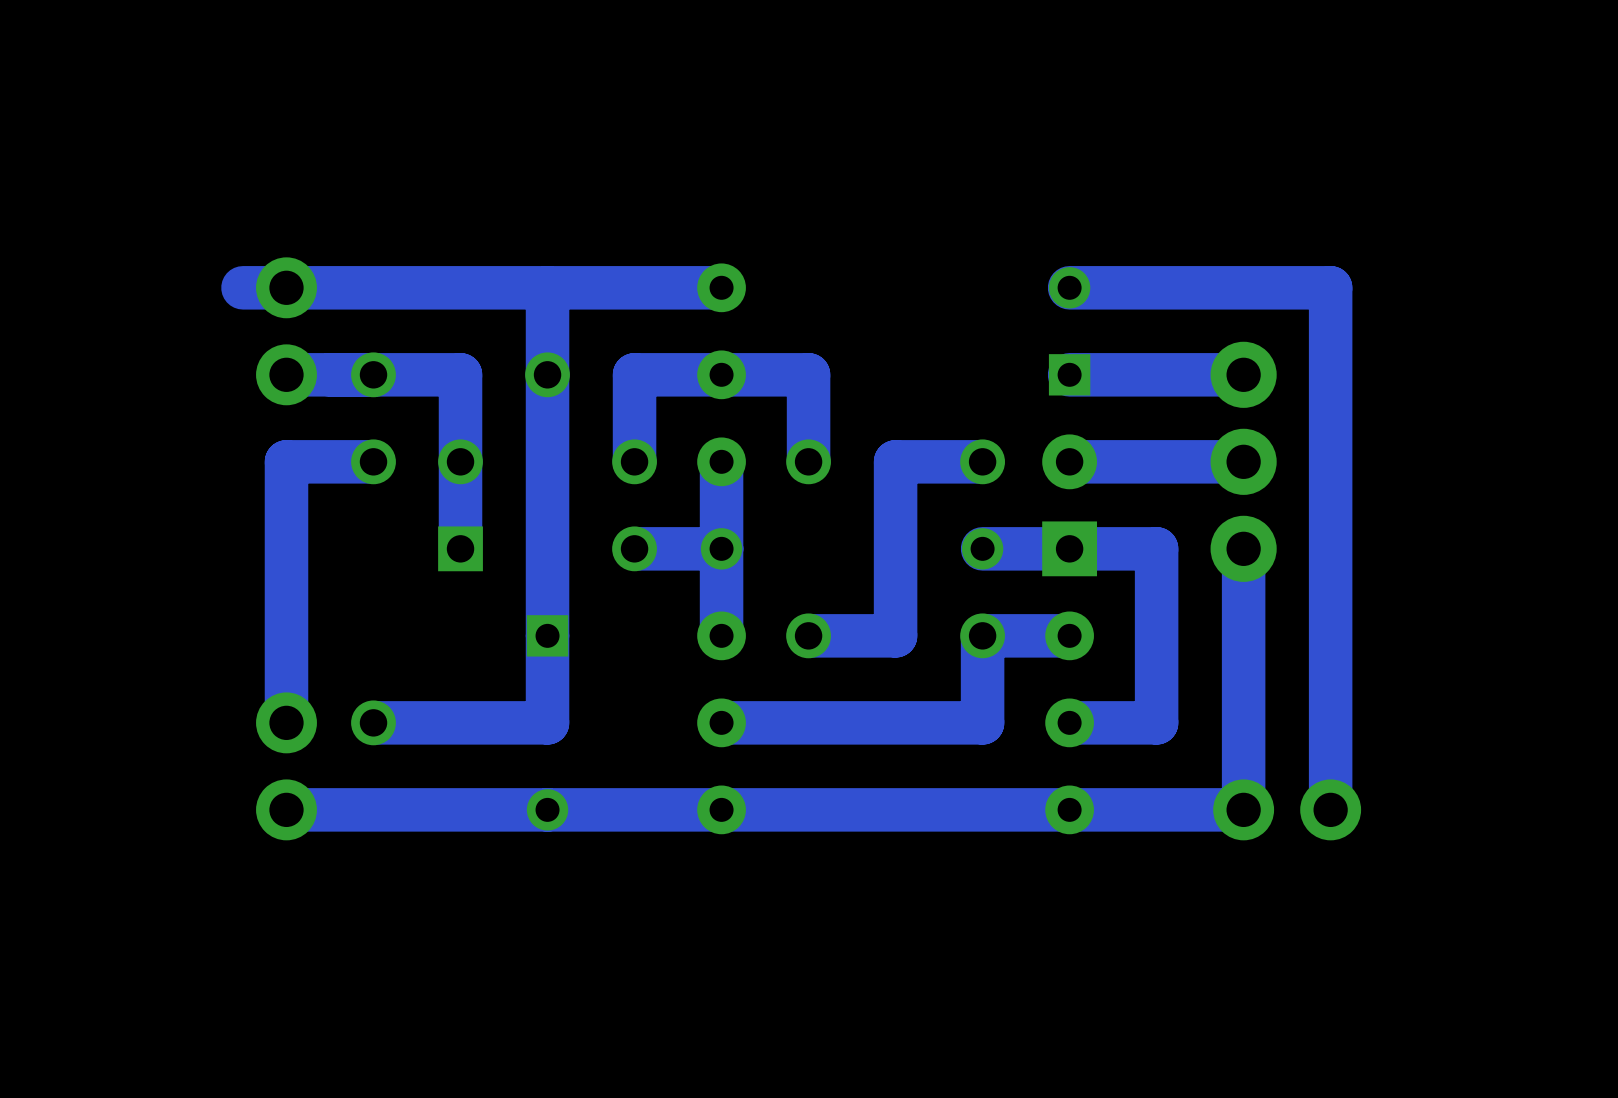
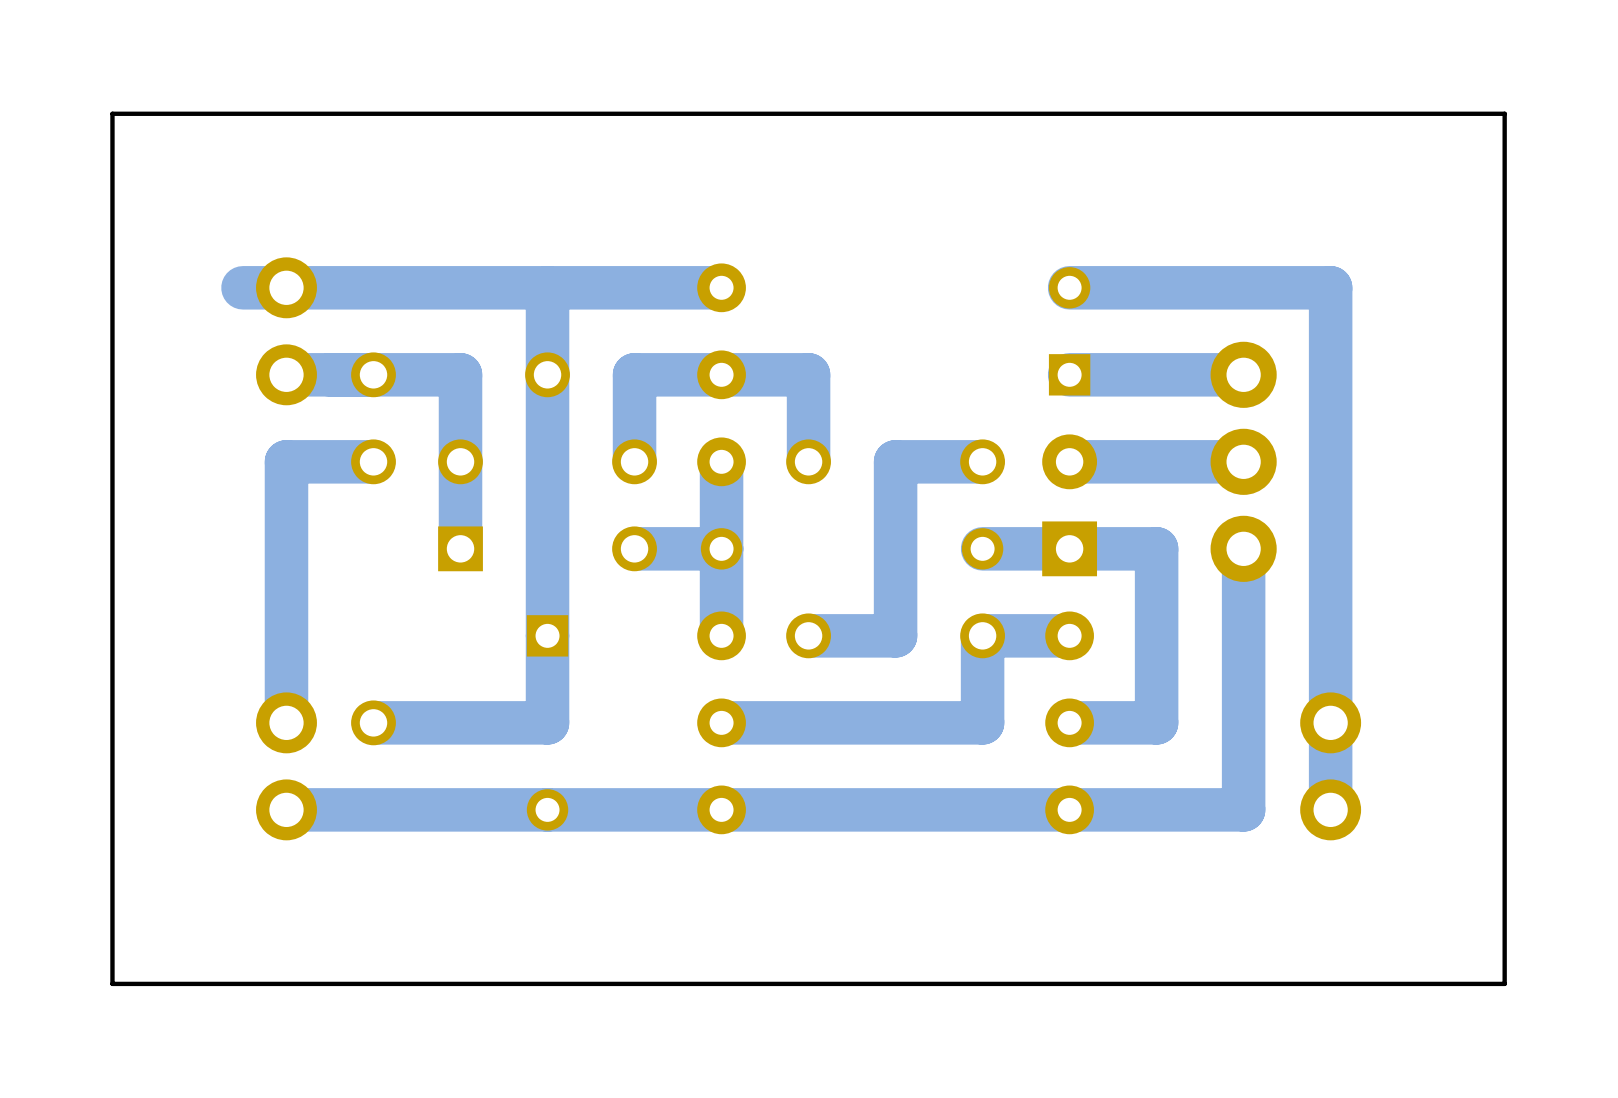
board edge: none -> (1504, 113) (1504, 983) (112, 983) (112, 113) (1504, 113)
part rotation: 0° (1287, 809) -> 90° clockwise (1330, 766)

